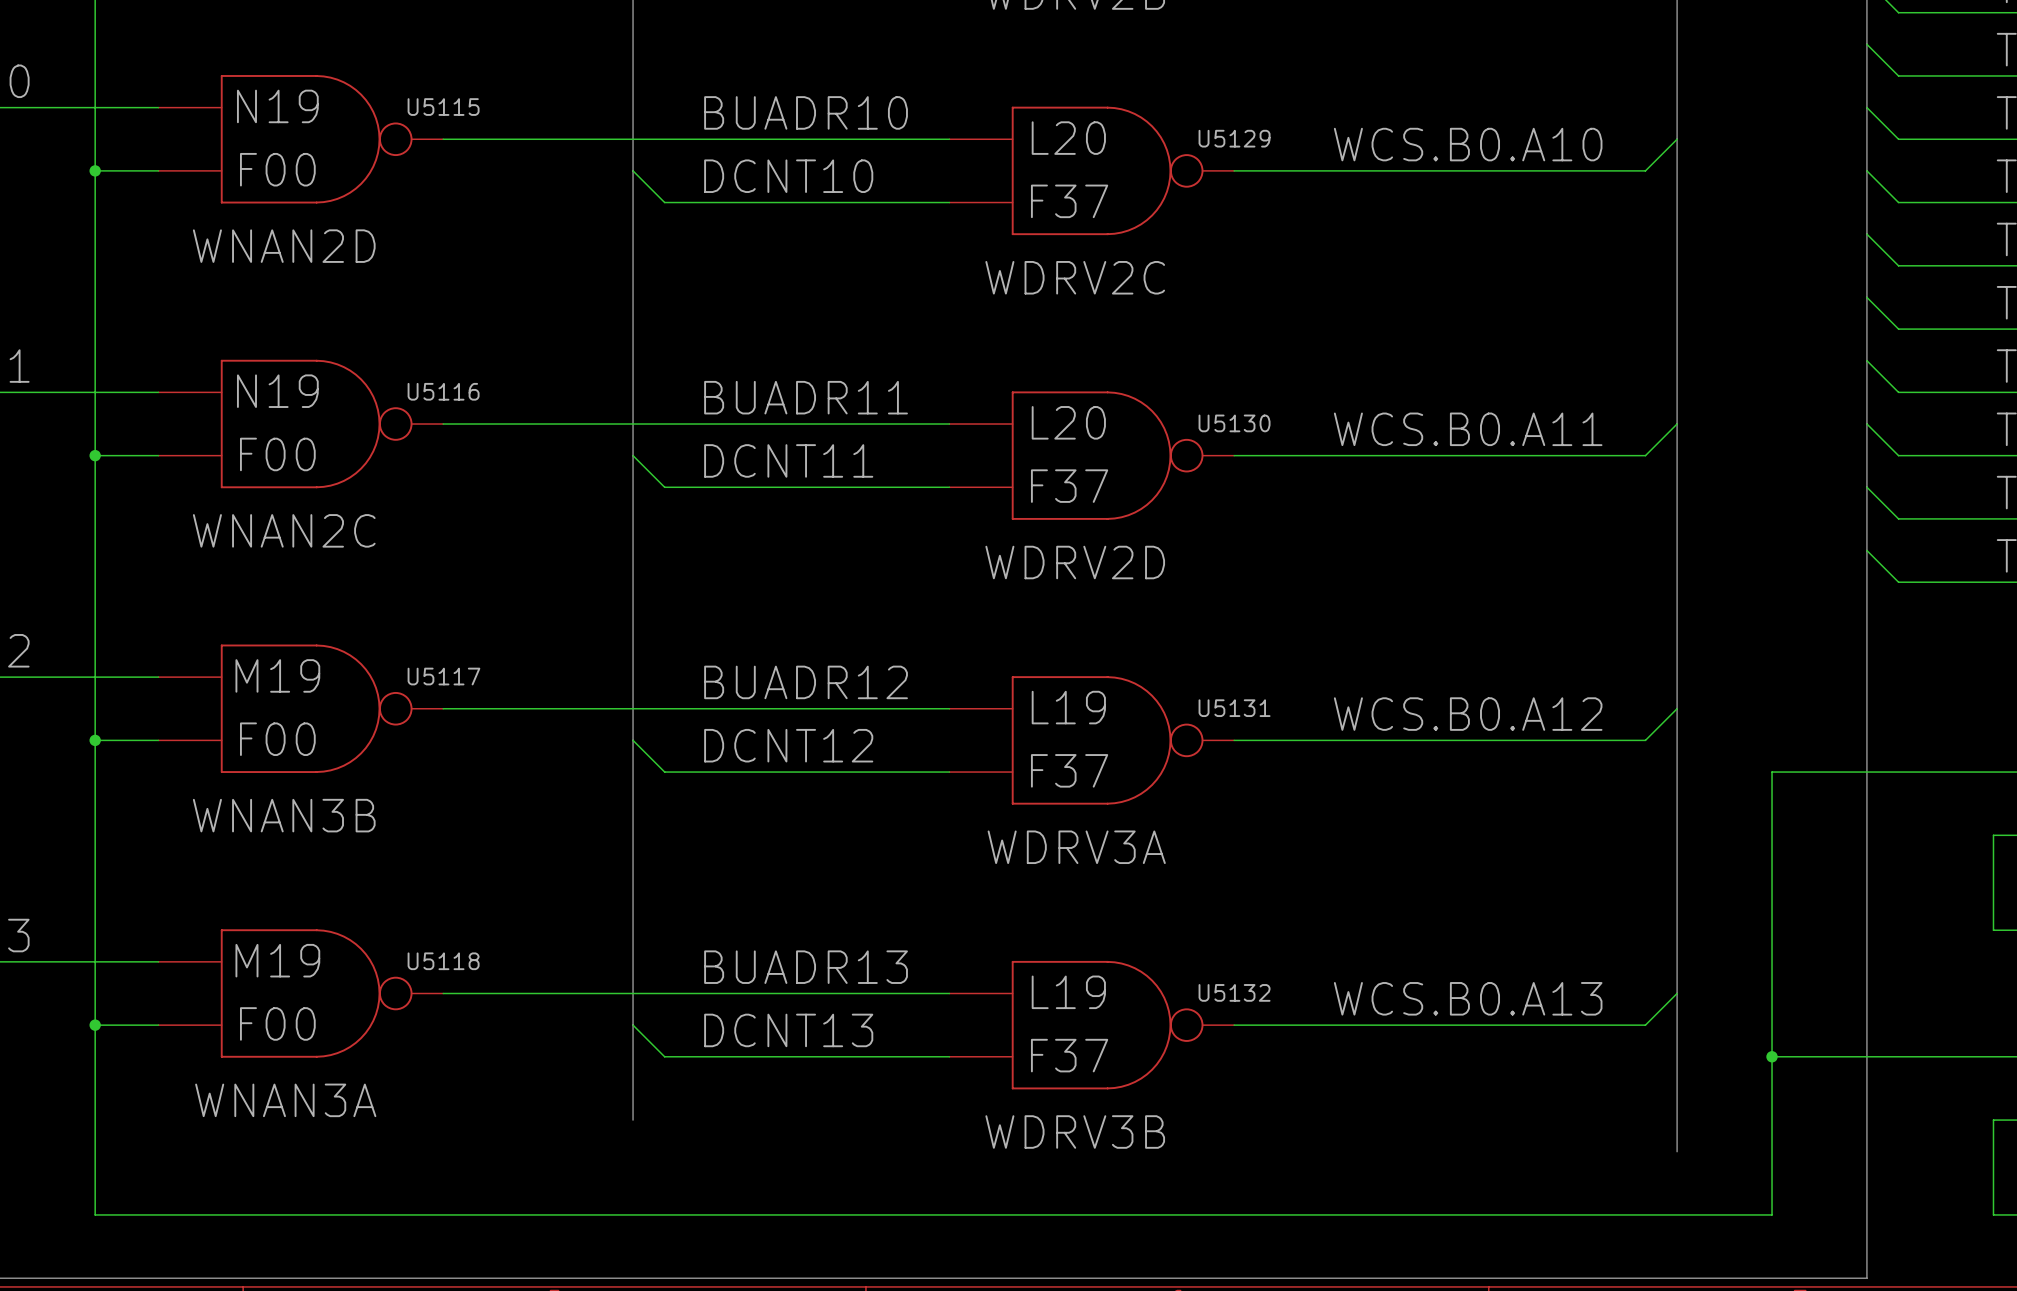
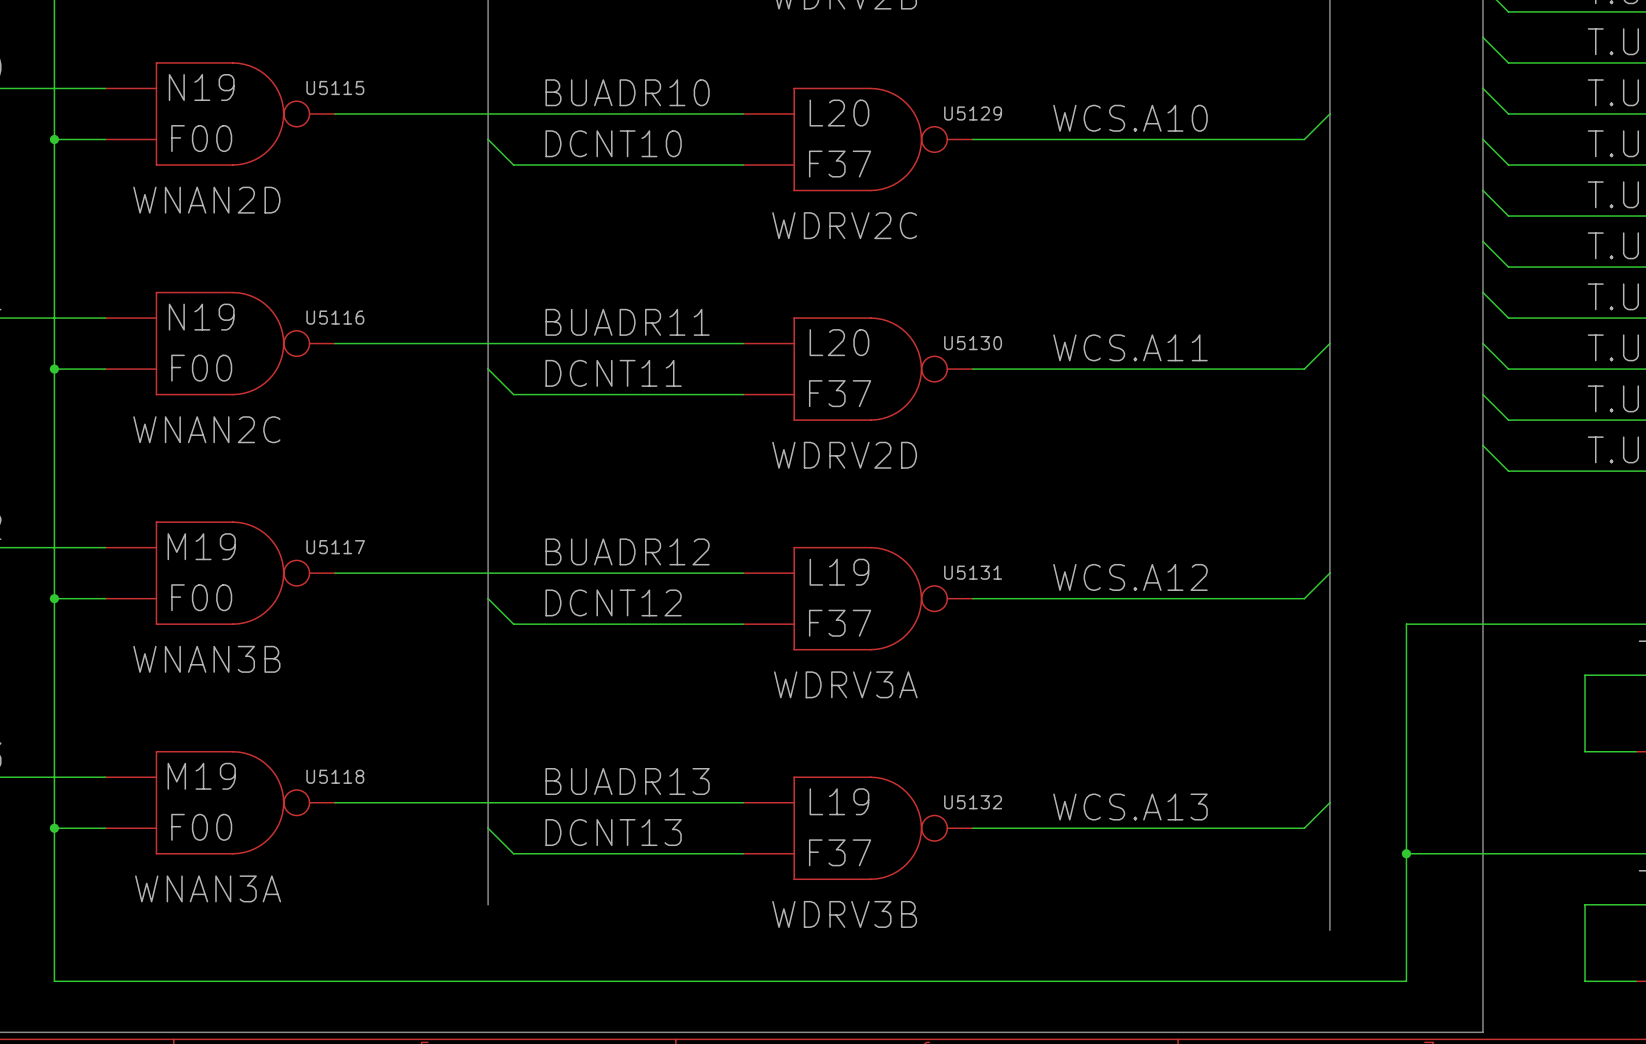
label: WCS.B0.A10 (1468, 144) -> WCS.A10 (1130, 118)
label: WCS.B0.A11 (1468, 429) -> WCS.A11 (1130, 347)
label: WCS.B0.A12 (1468, 714) -> WCS.A12 (1130, 577)
label: WCS.B0.A13 (1468, 998) -> WCS.A13 (1130, 807)

